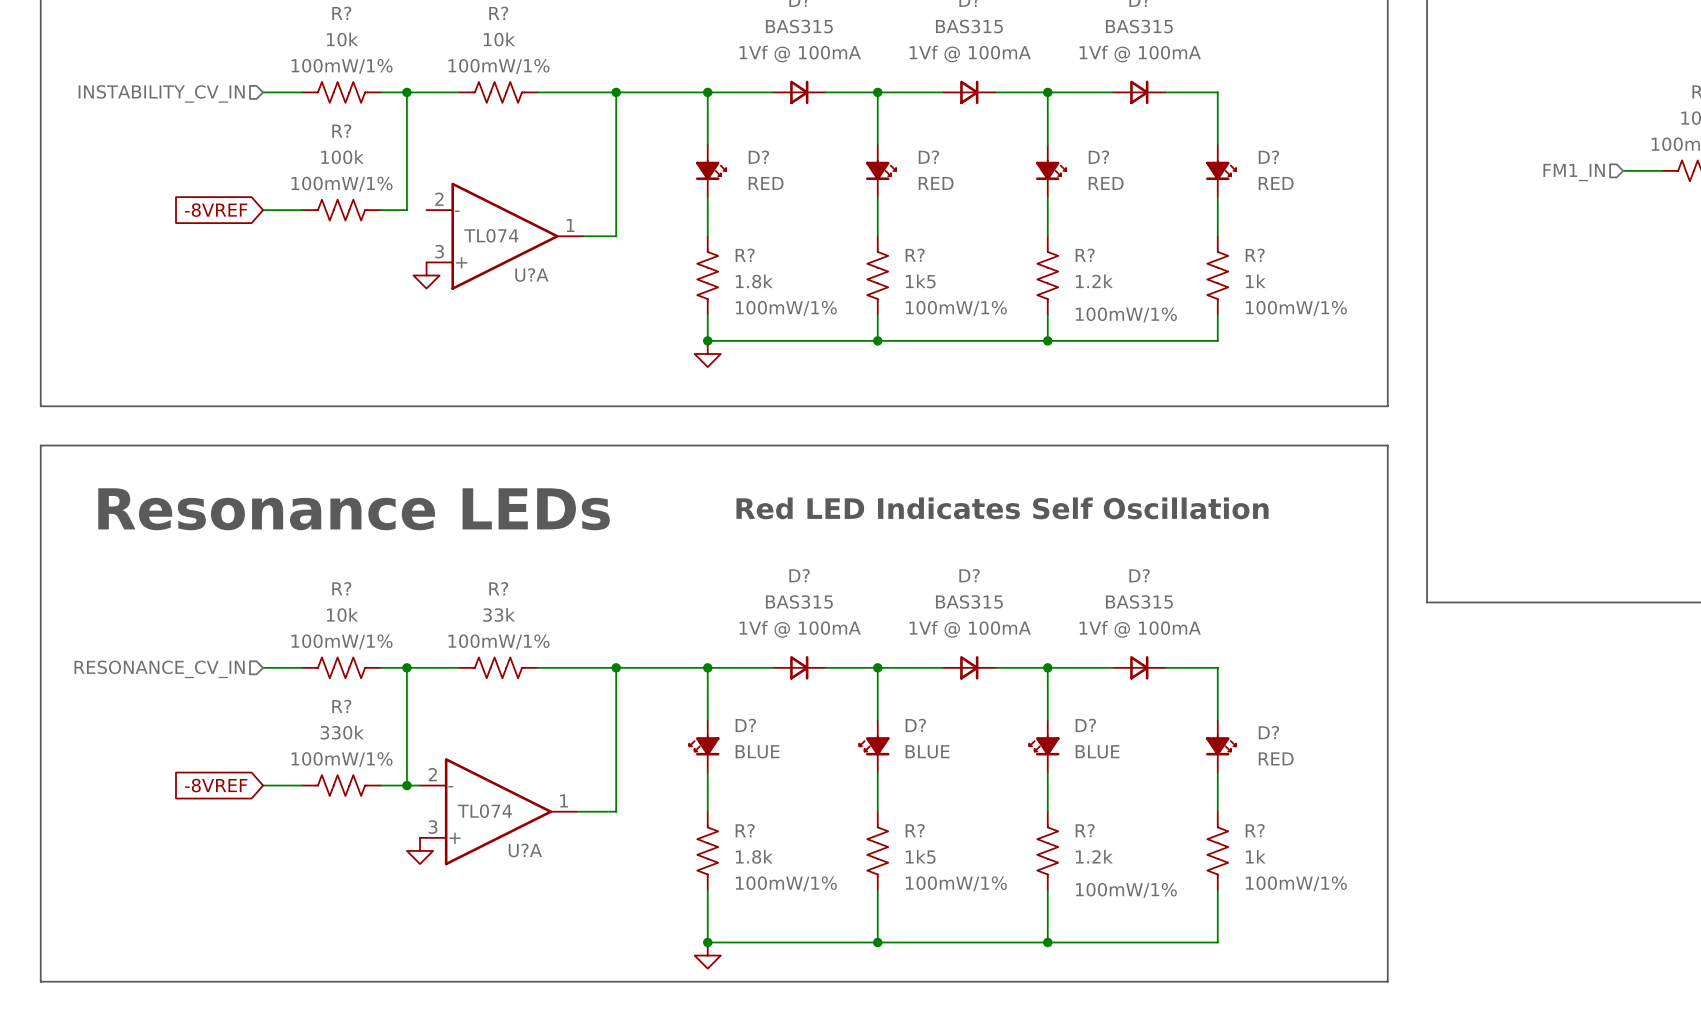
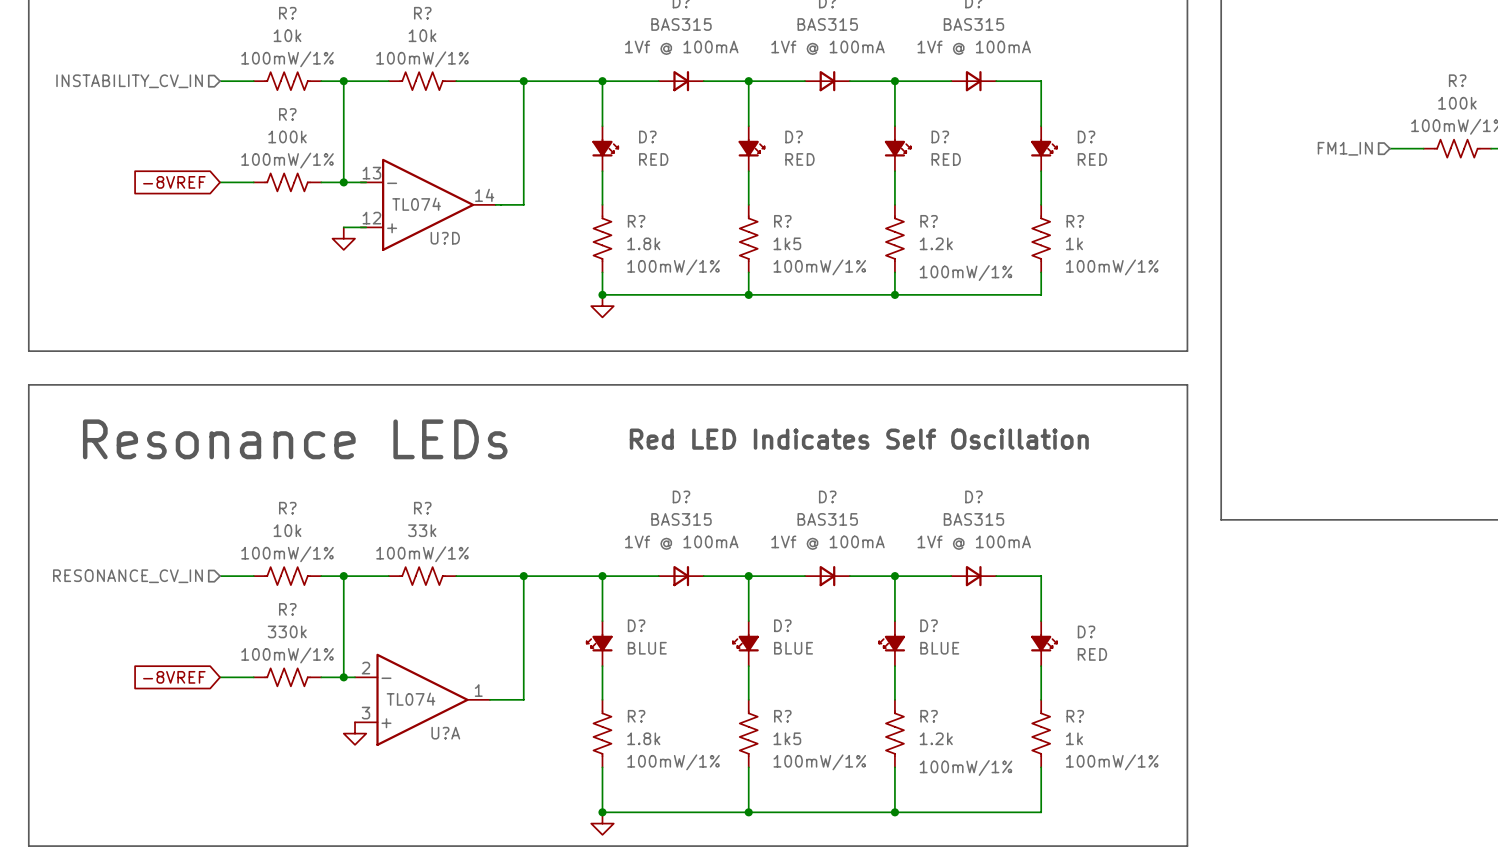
U?A pin number: 2 (439, 199) -> 13 (371, 173)
wire: none -> (343, 182) (366, 182)
junction: none -> (343, 182)
U?A pin number: 1 (570, 225) -> 14 (484, 195)
U?A pin number: 3 (439, 251) -> 12 (371, 218)
wire: none -> (343, 227) (366, 227)
power symbol position: (426, 275) -> (343, 238)
U?A name: U?A (531, 275) -> U?D (445, 238)

